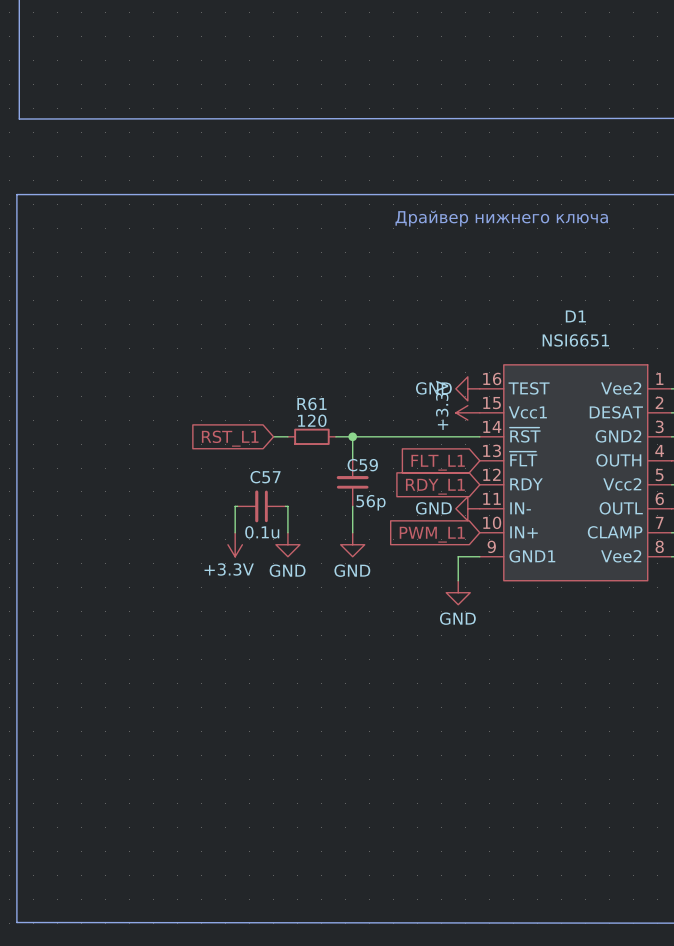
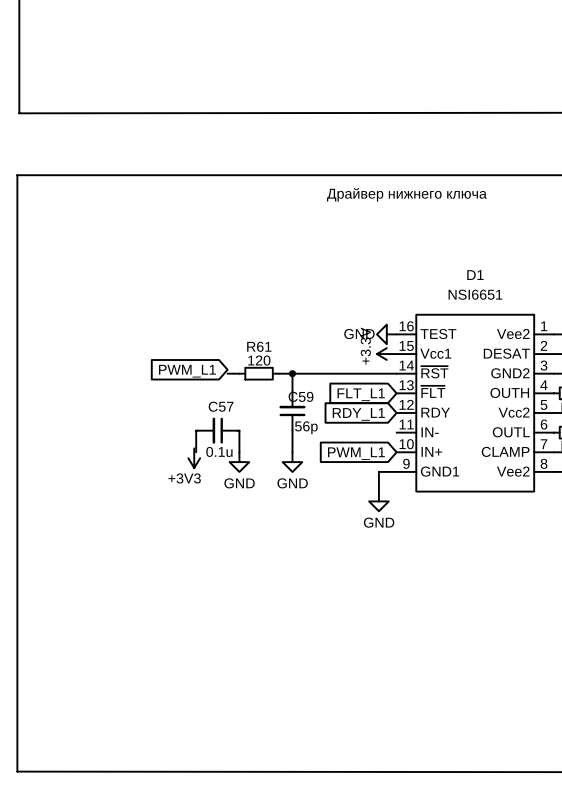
global label: RST_L1 (230, 438) -> PWM_L1 (187, 371)
power symbol: GND (467, 508) -> none
power symbol: +3.3V (235, 544) -> +3V3 (194, 458)

